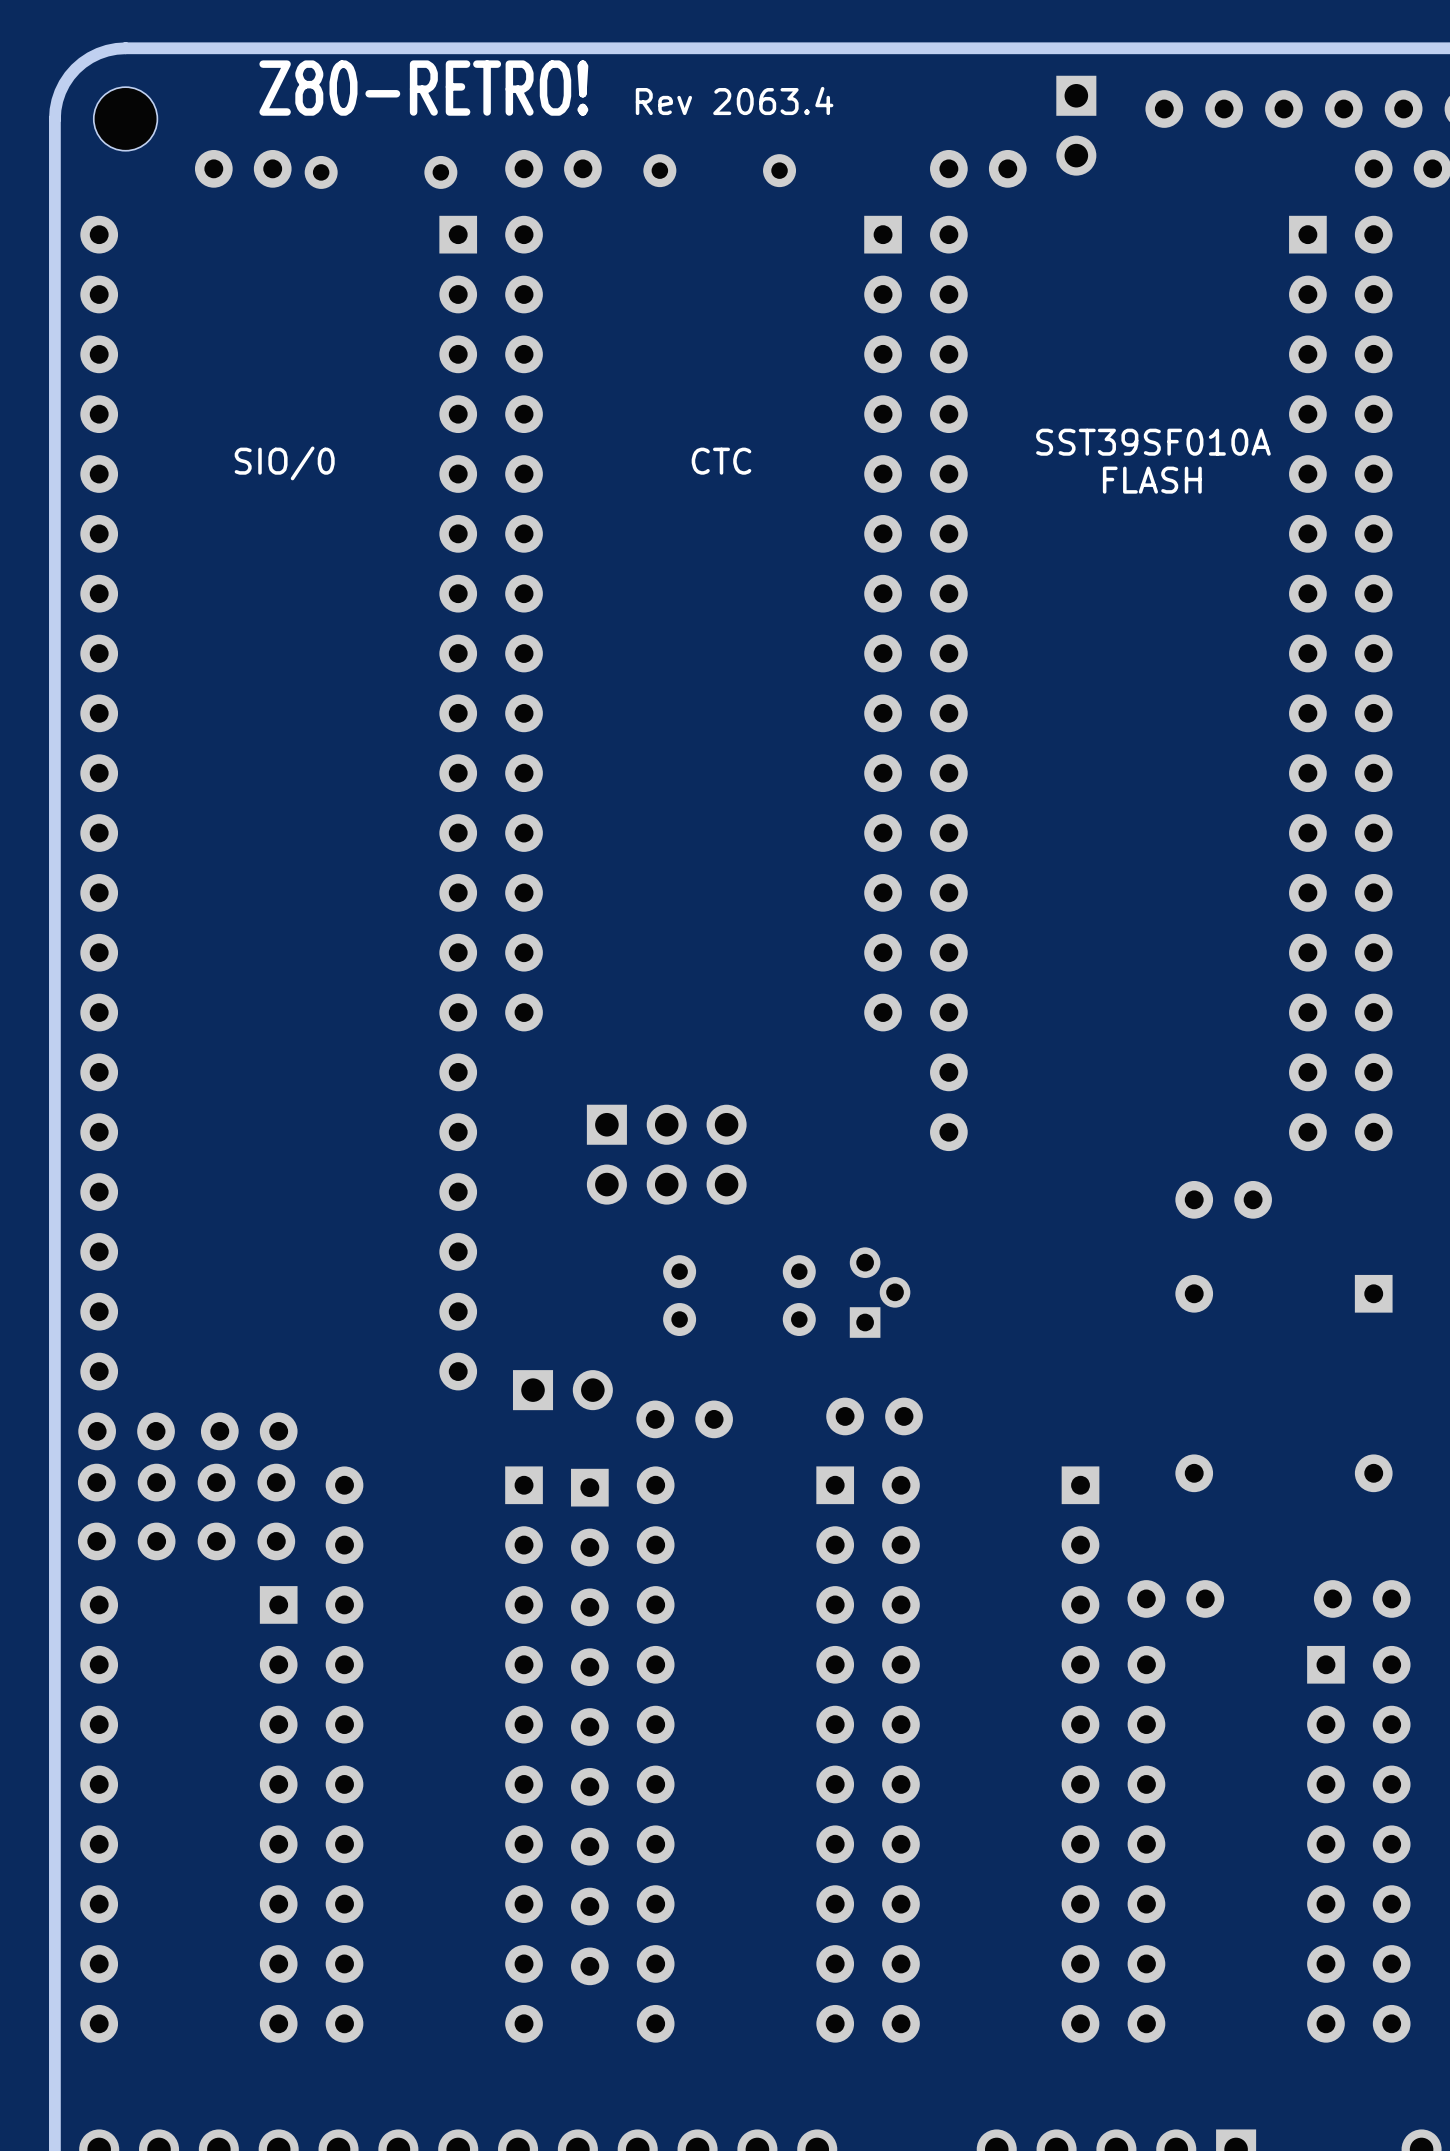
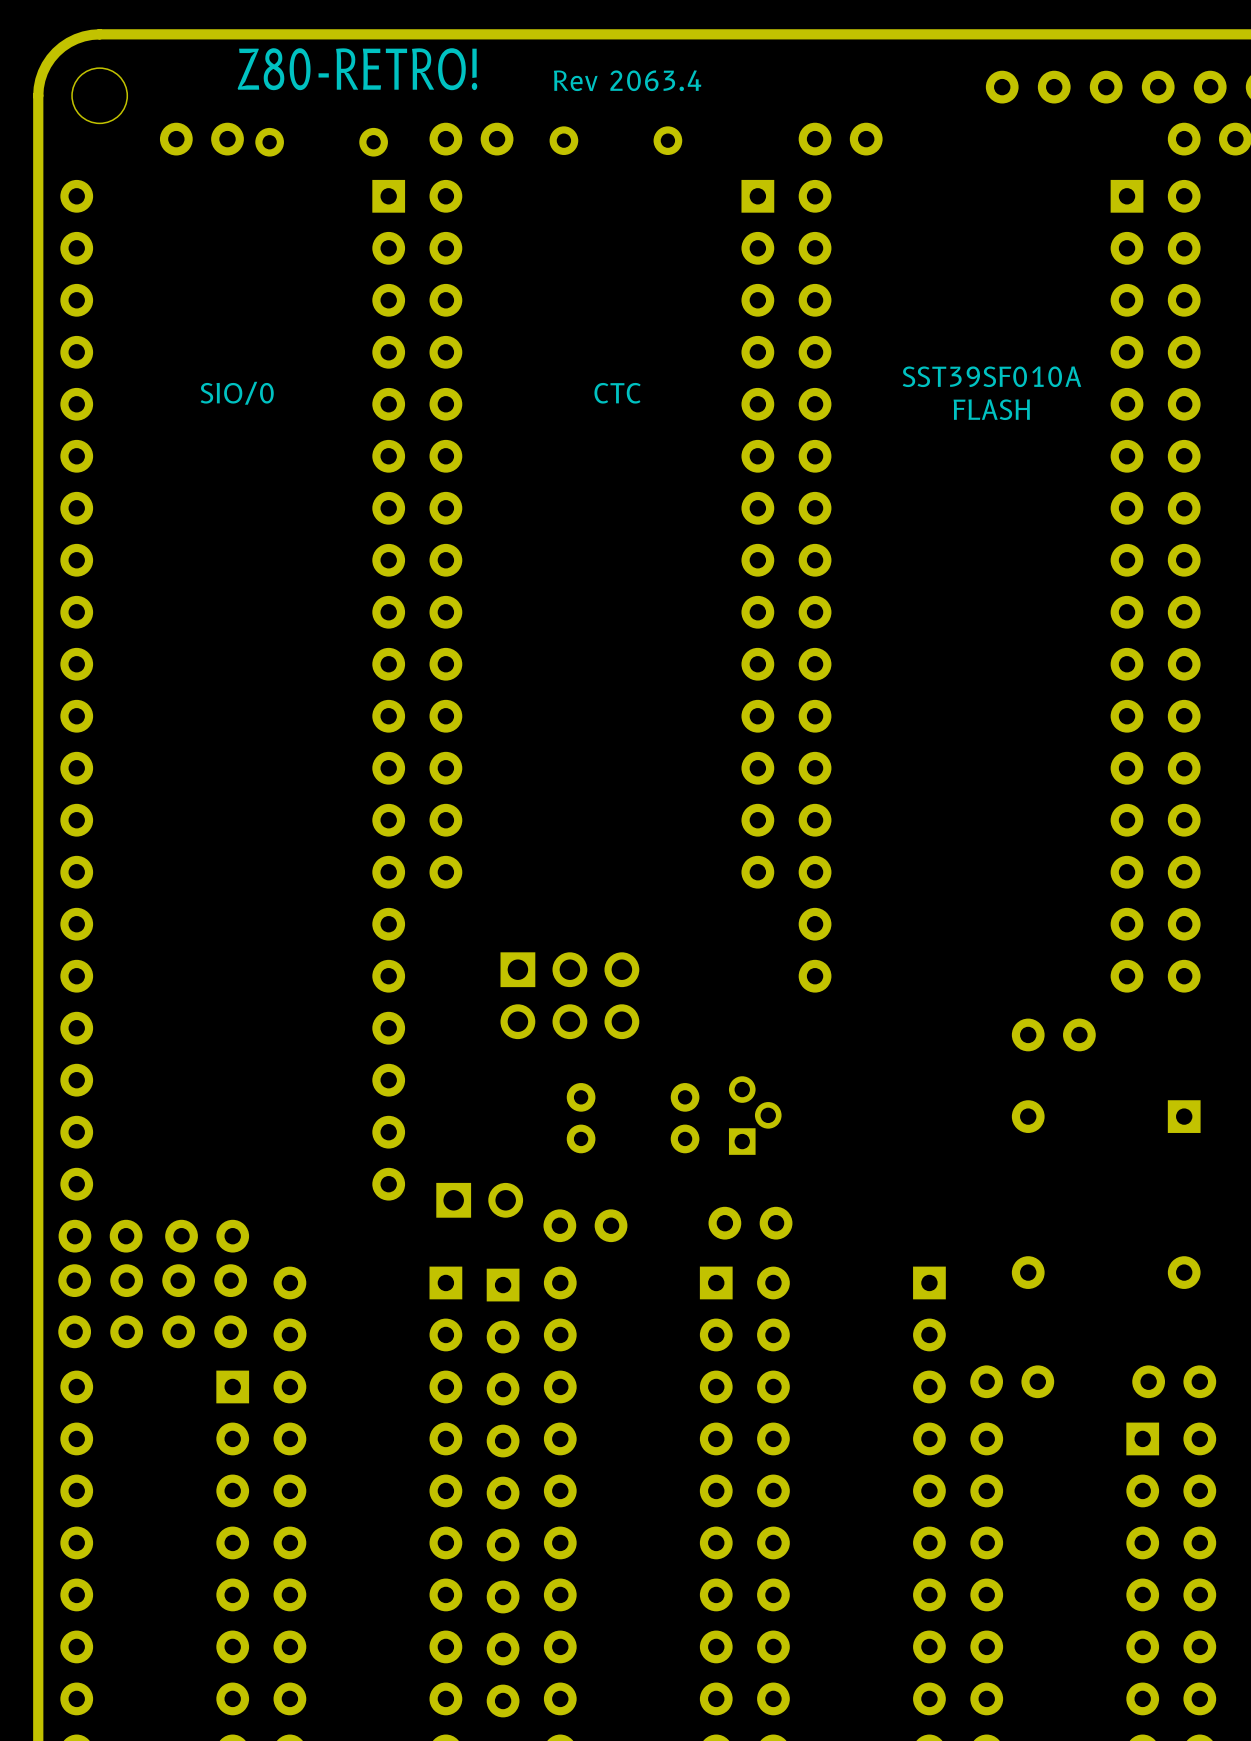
part: (1076, 125) -> none

